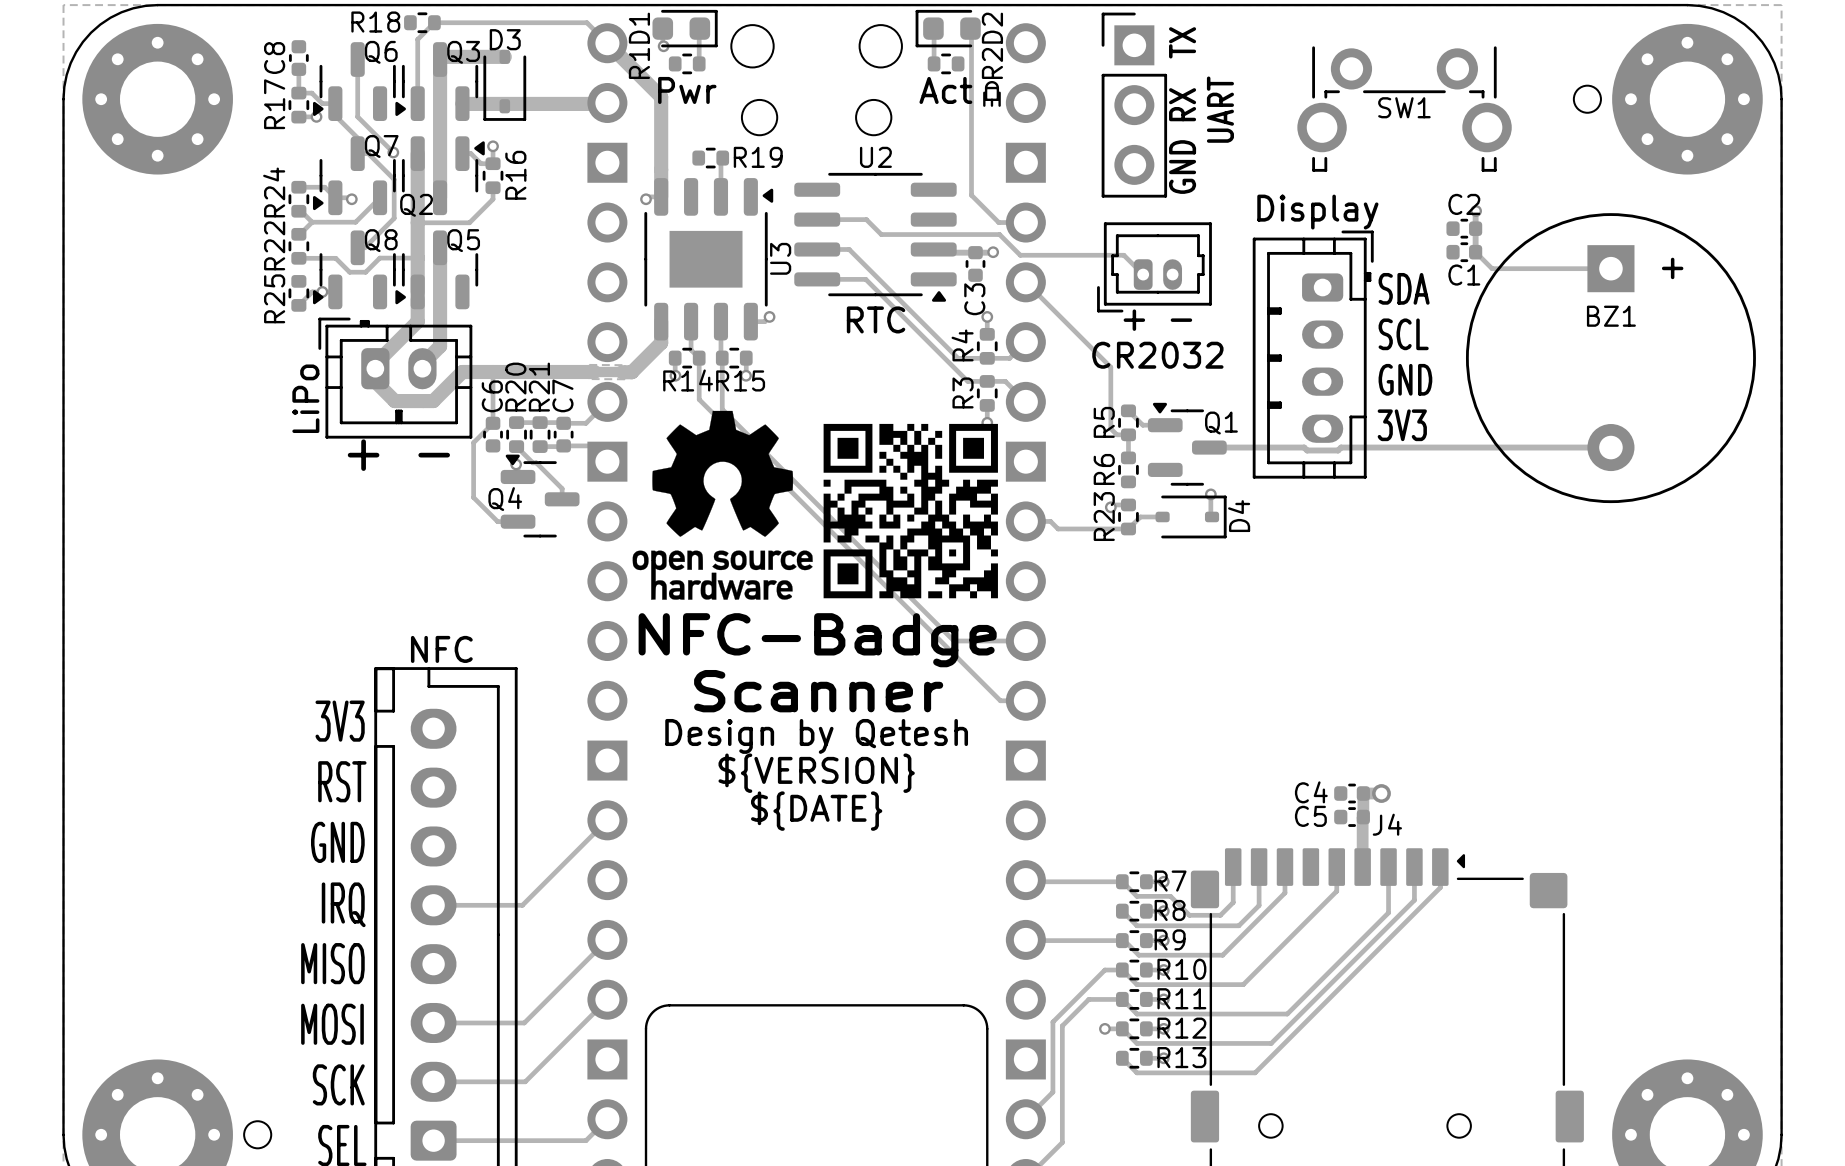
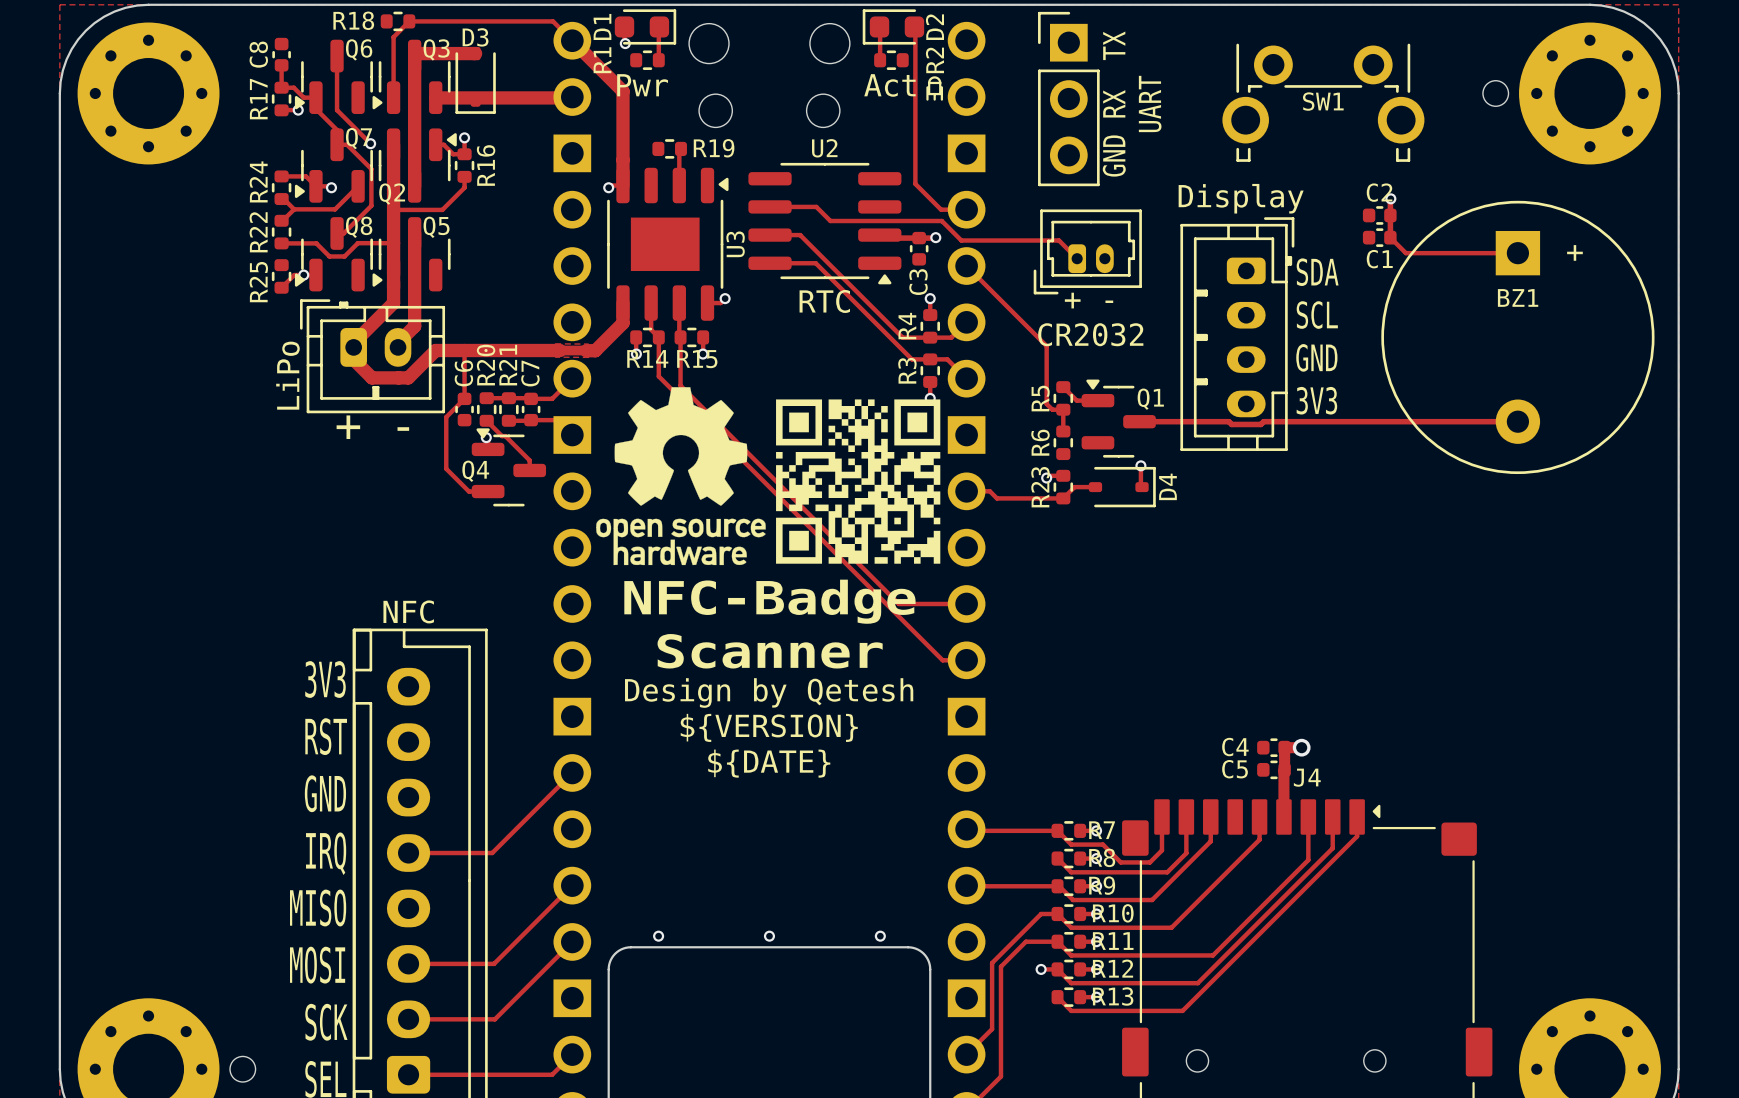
via: none -> (658, 936)
via: none -> (769, 936)
via: none -> (880, 936)

